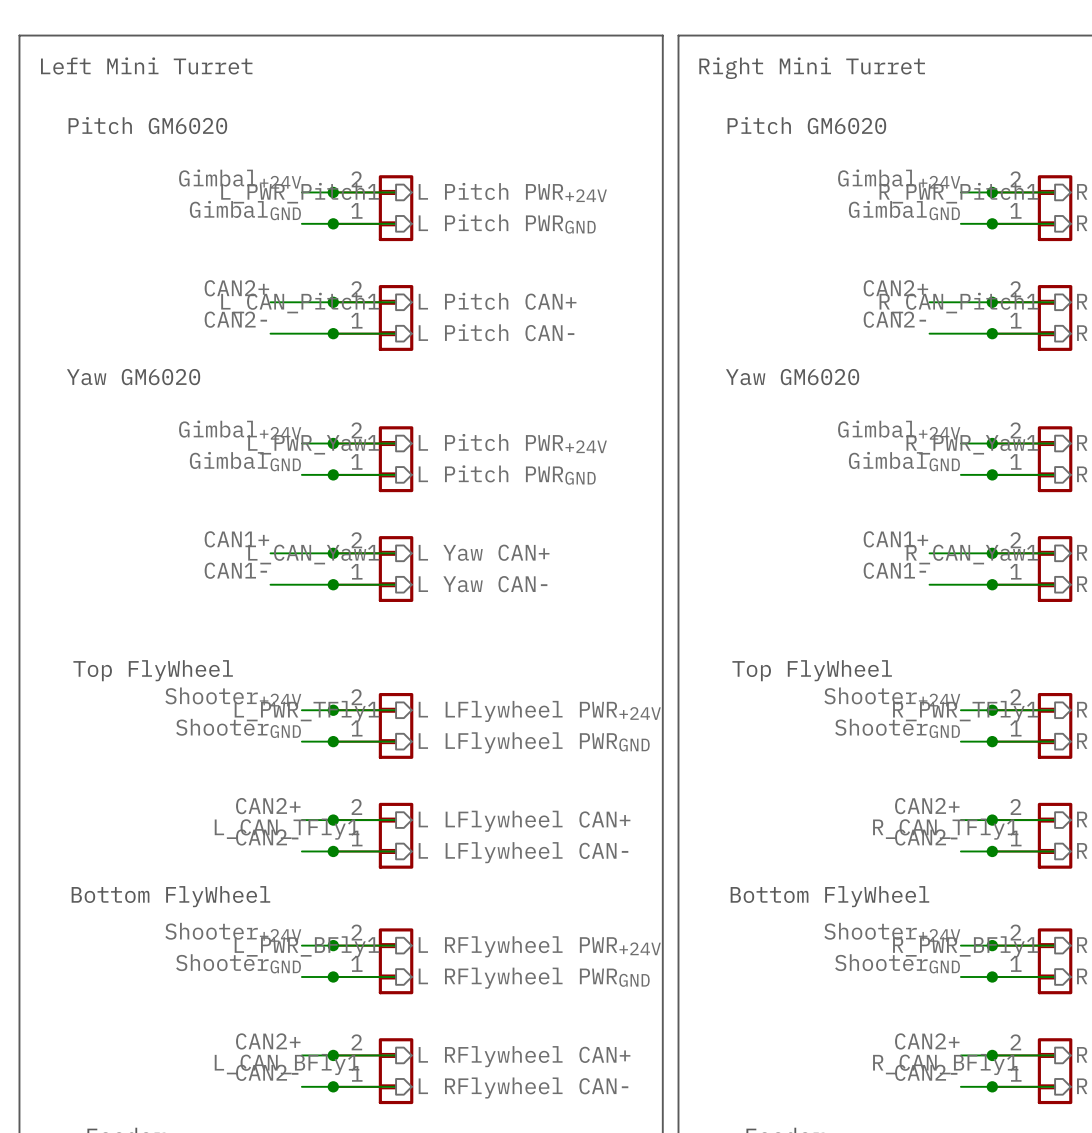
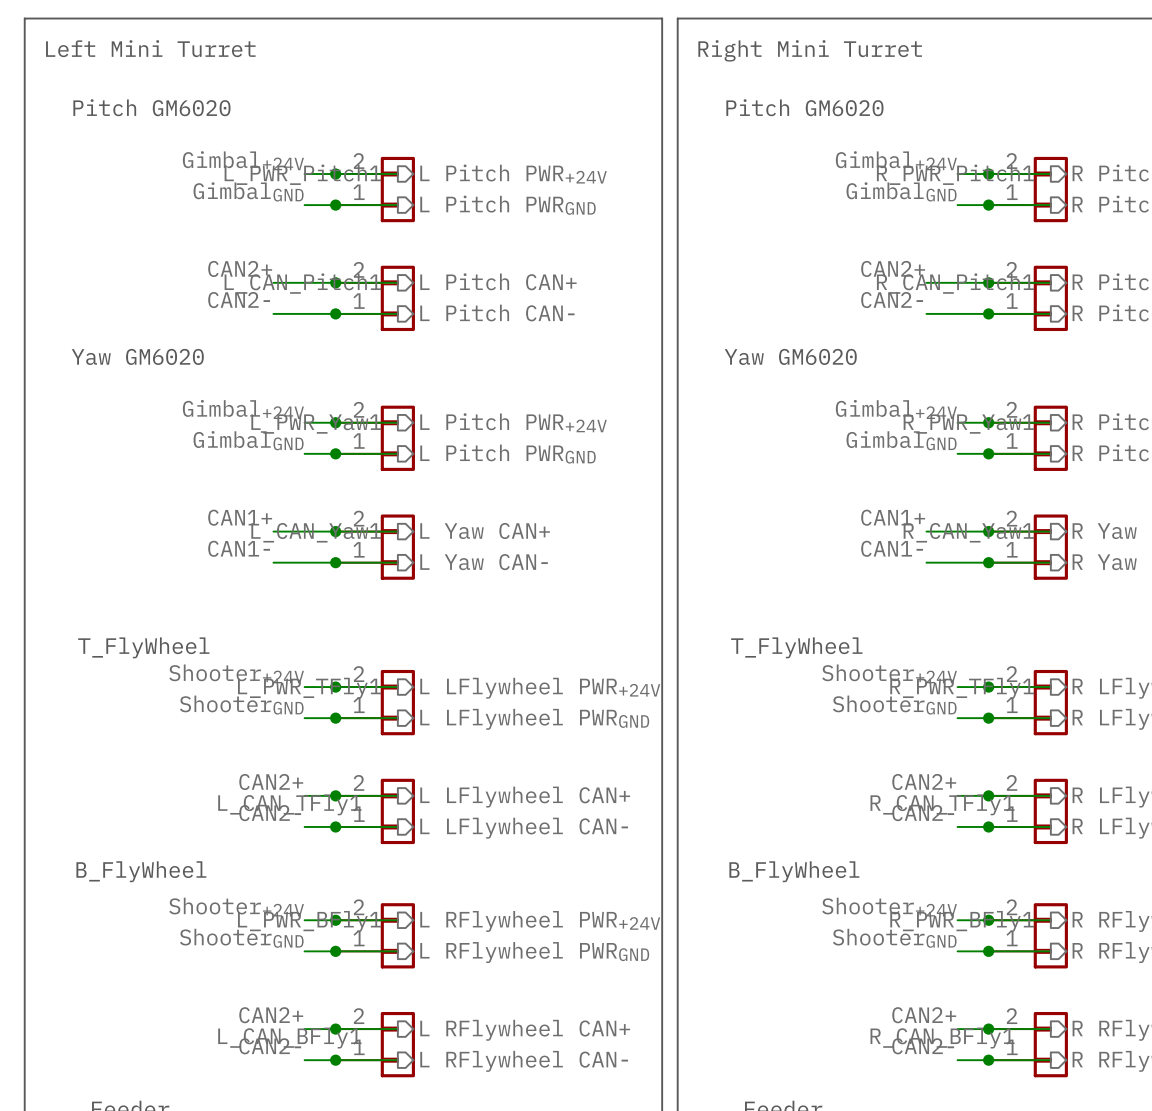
text: Top FlyWheel (153, 670) -> T_FlyWheel (143, 647)
text: Top FlyWheel (812, 670) -> T_FlyWheel (796, 647)
text: Bottom FlyWheel (170, 896) -> B_FlyWheel (141, 871)
text: Bottom FlyWheel (829, 896) -> B_FlyWheel (794, 871)

